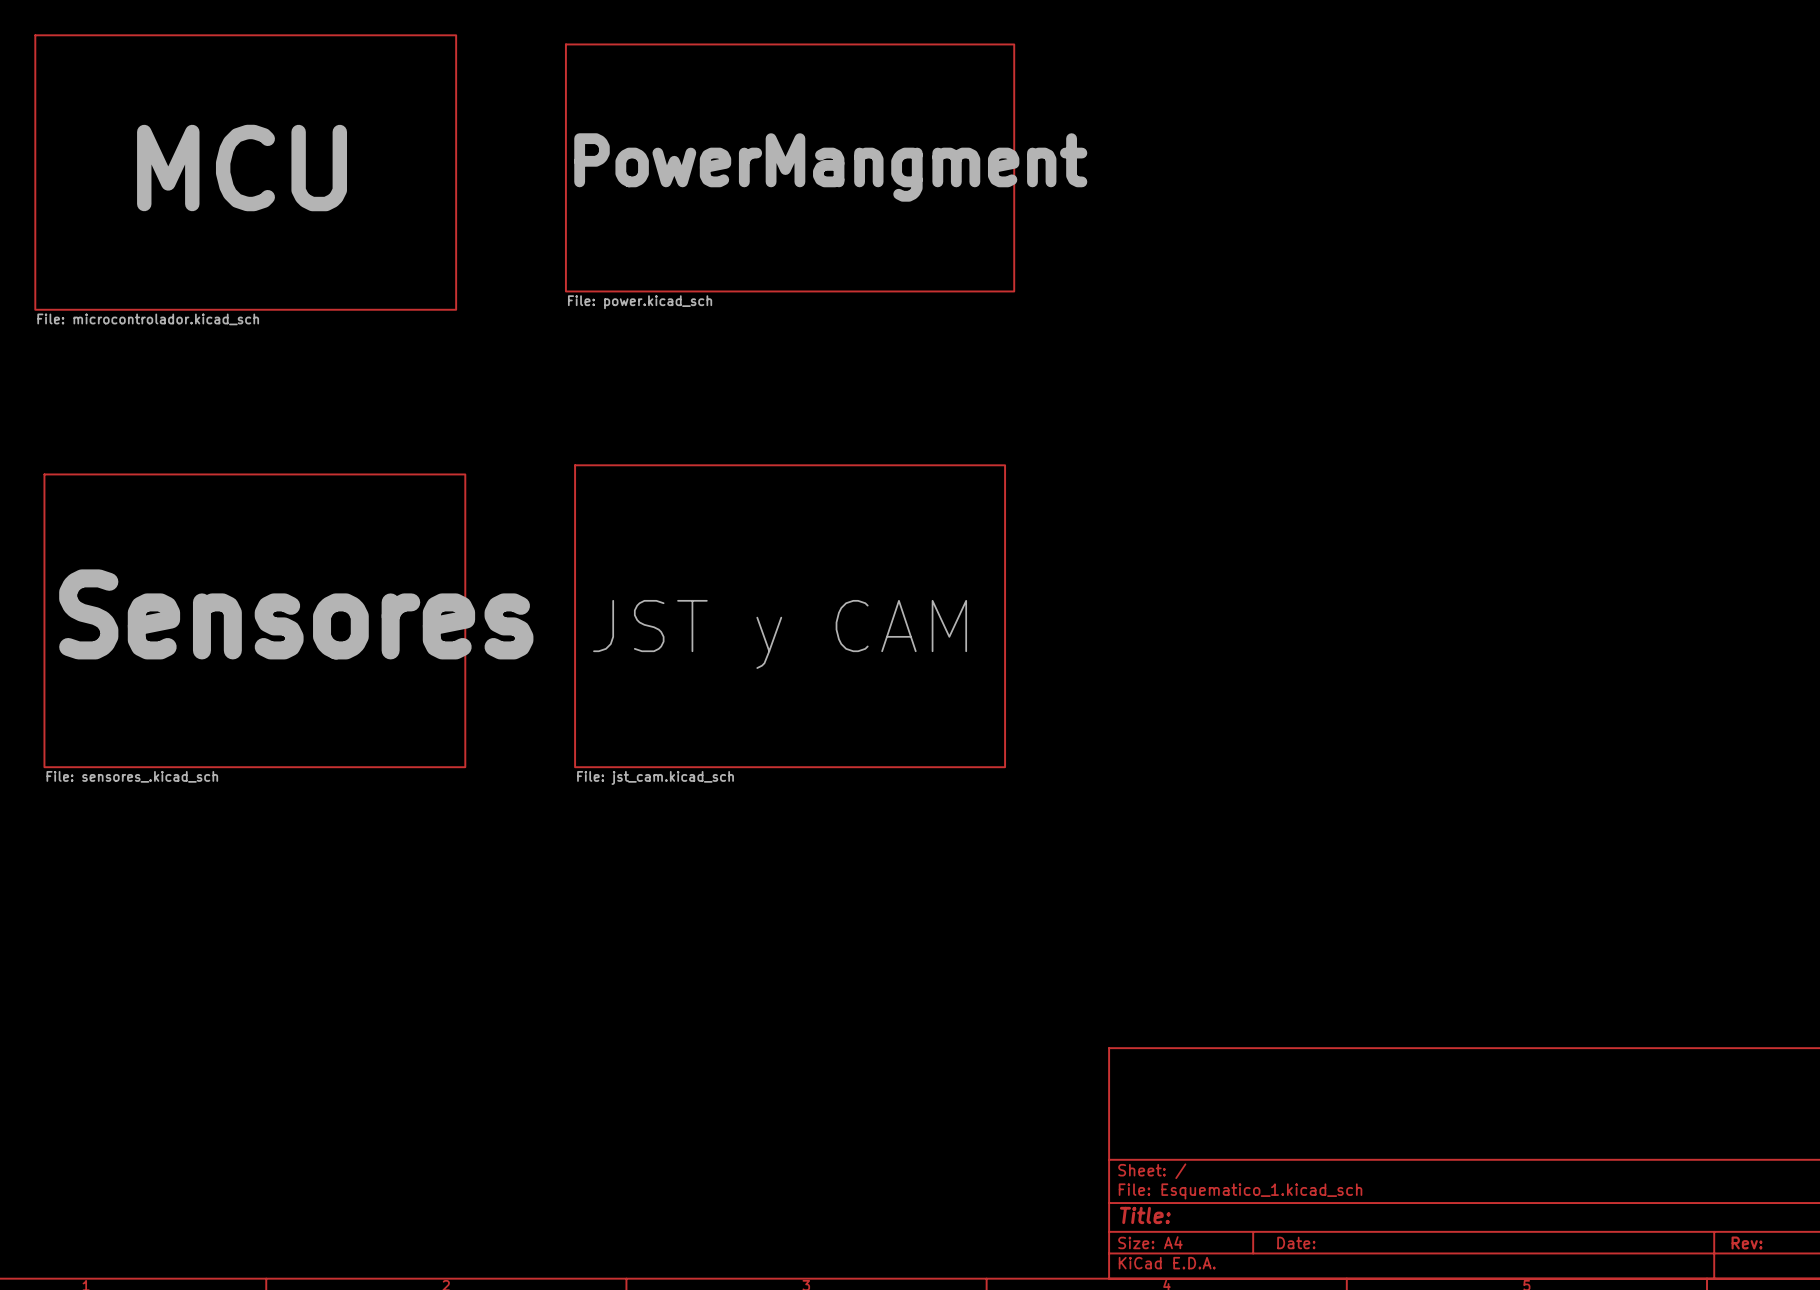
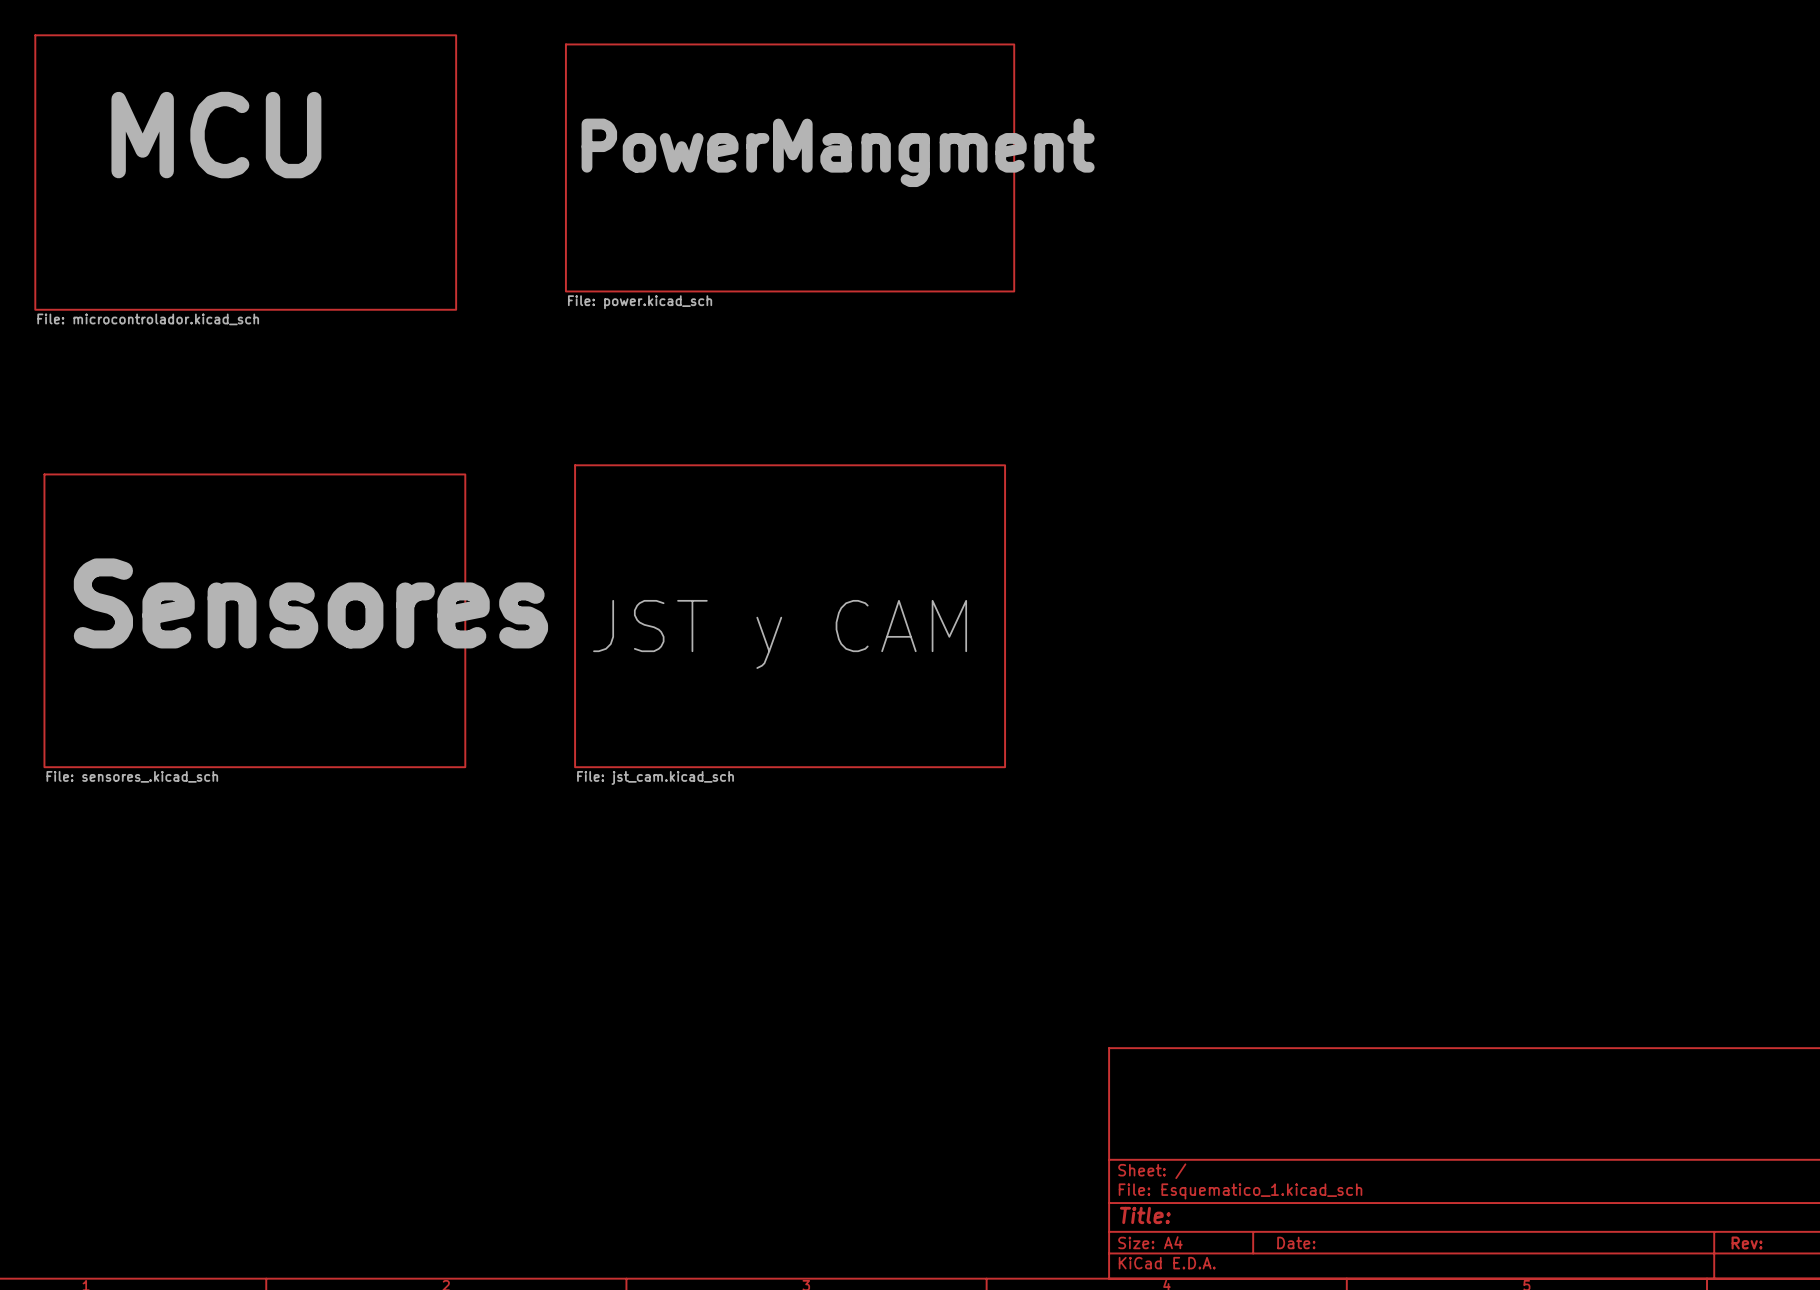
sheet PowerMangment name position: PowerMangment (830, 167) -> PowerMangment (838, 152)
sheet MCU name position: MCU (242, 168) -> MCU (216, 135)
sheet Sensores name position: Sensores (296, 614) -> Sensores (310, 603)

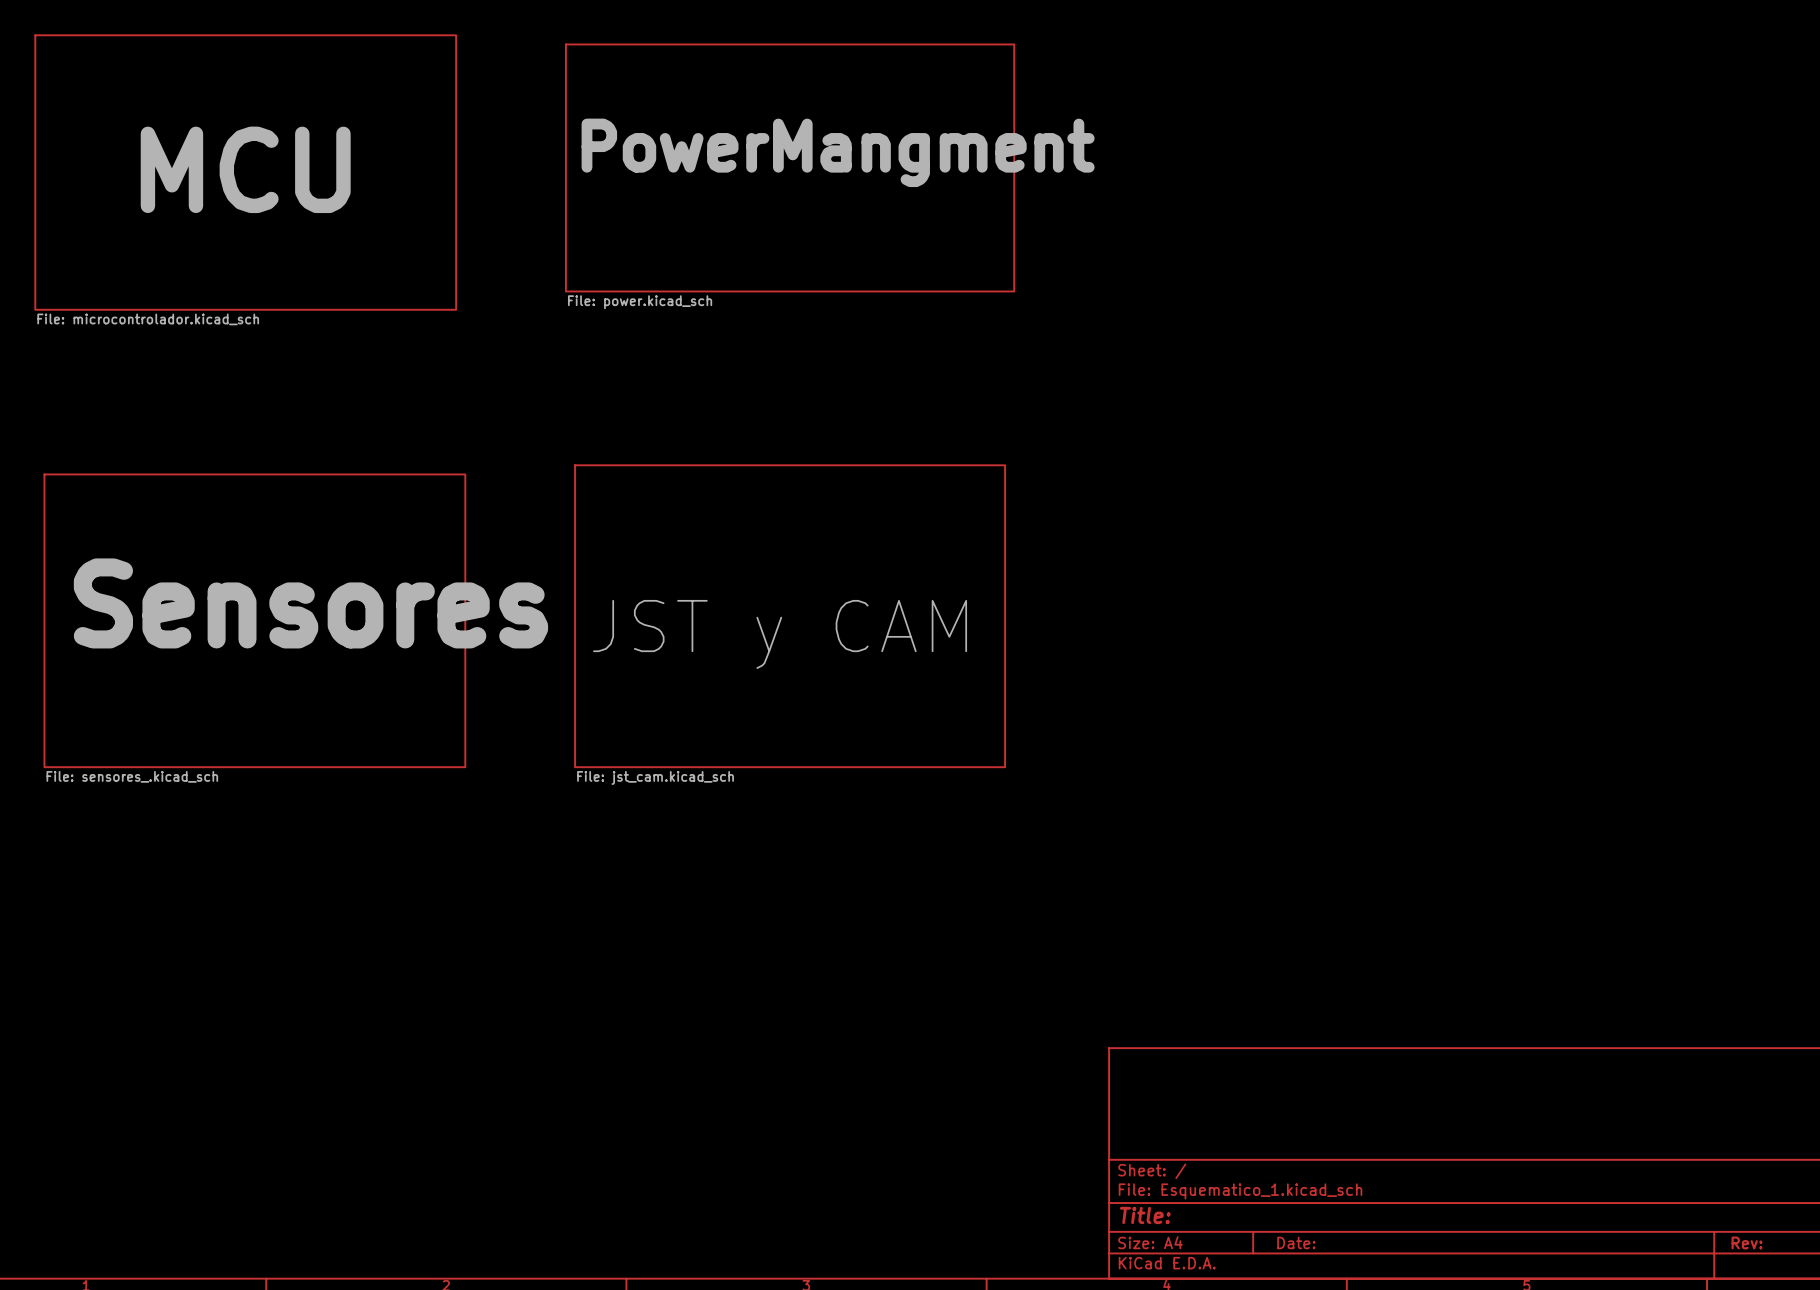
sheet MCU name position: MCU (216, 135) -> MCU (245, 169)

